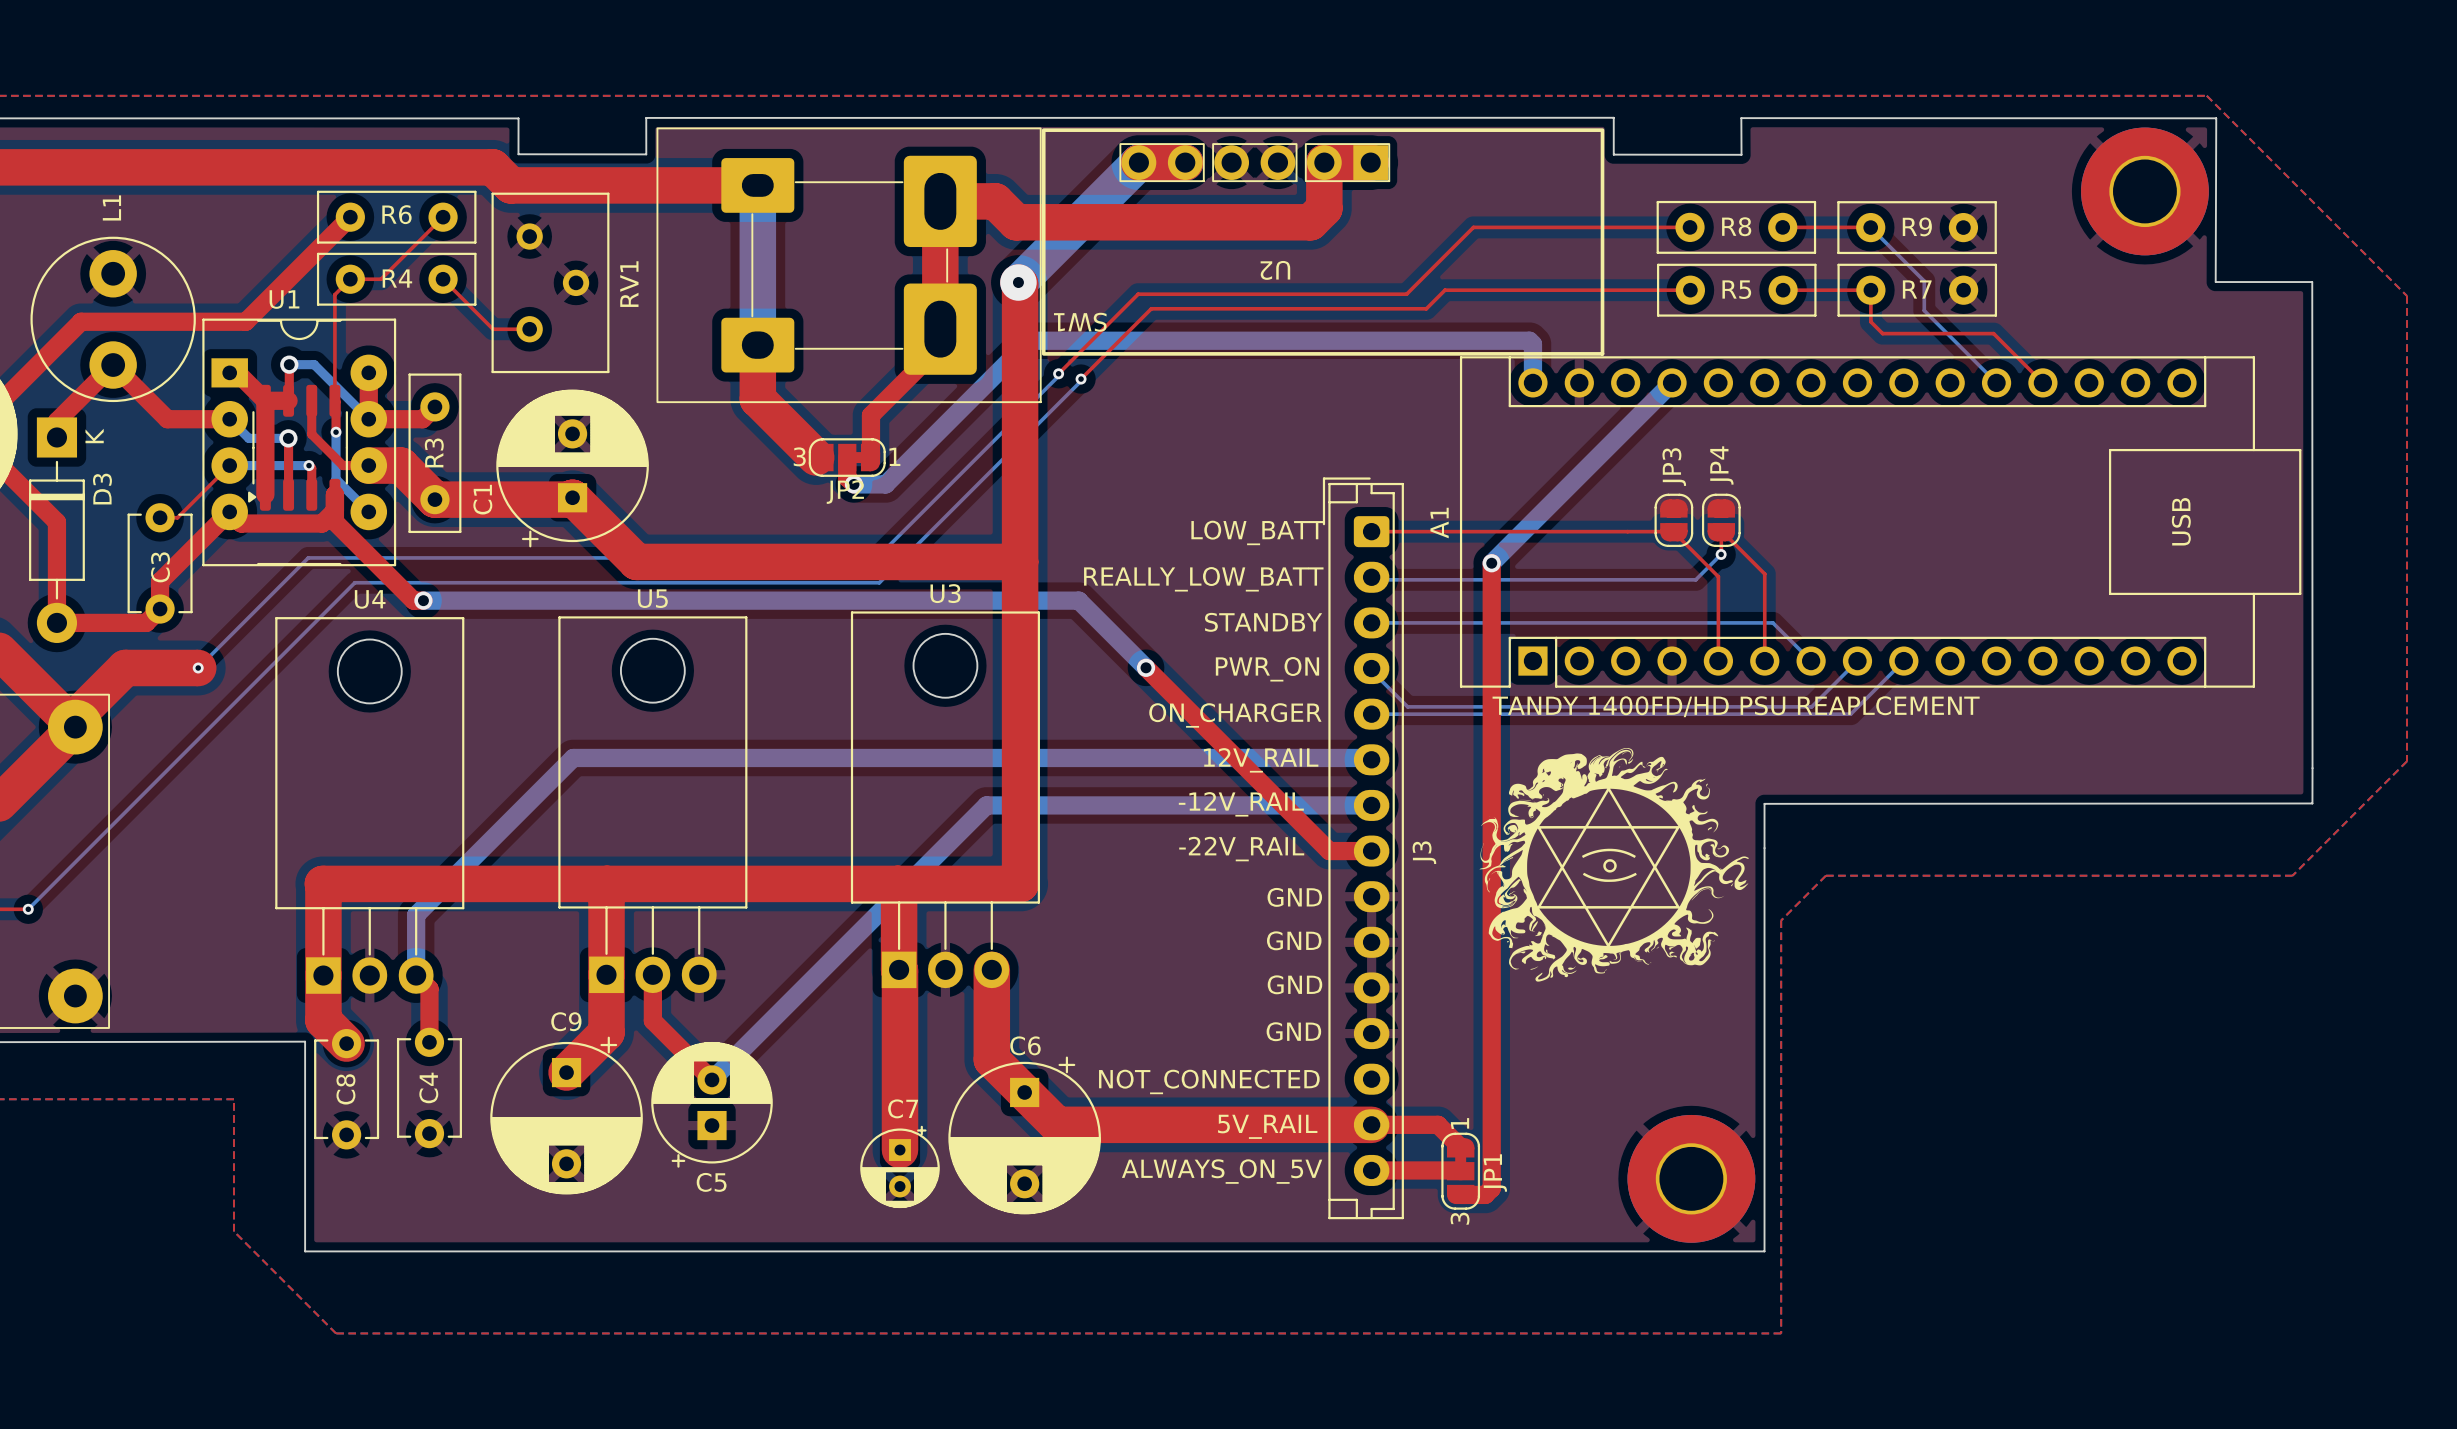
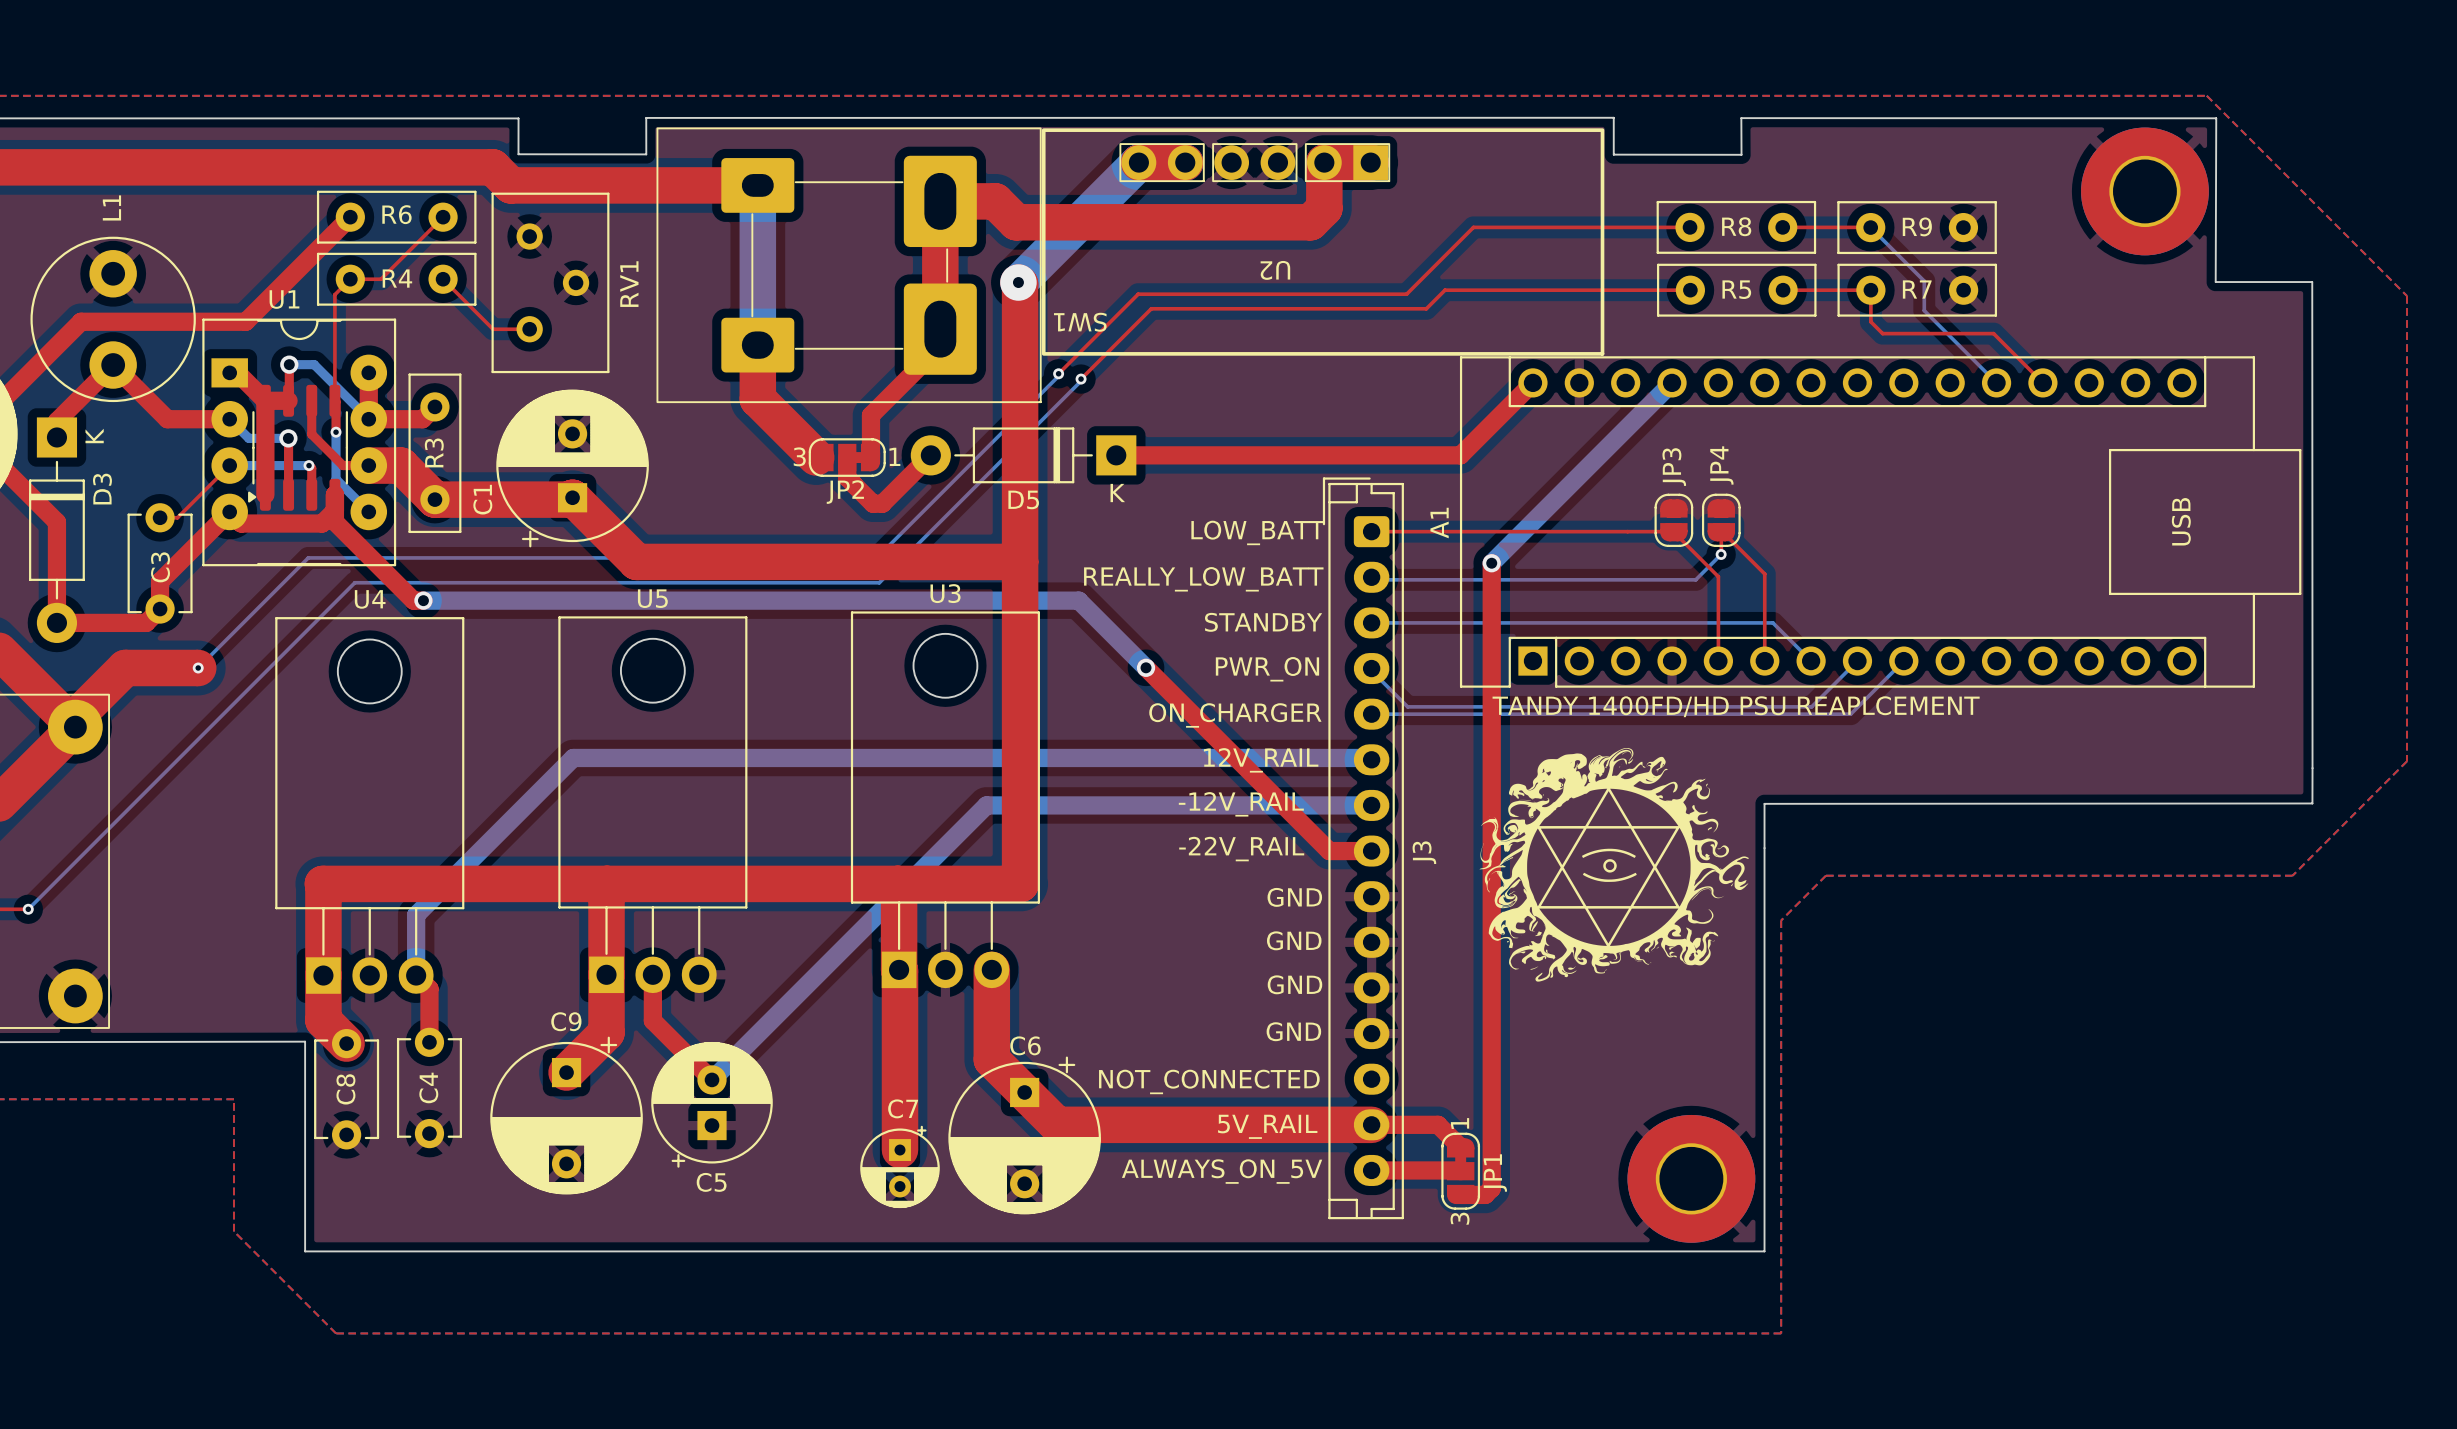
top track: none -> (1532, 382) (1460, 455) (1116, 455)
bottom track: (1532, 382) (1532, 344) (1529, 340) (1029, 340) (885, 484) (853, 484) -> none
top track: none -> (930, 455) (882, 503) (872, 503) (853, 484)
D5: none -> (1023, 455)
via: (853, 484) -> none

